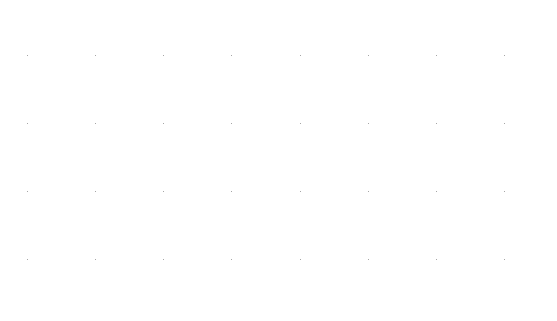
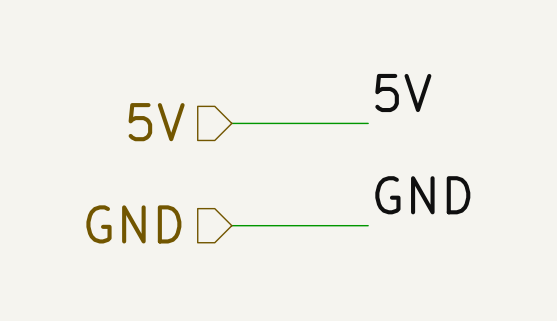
label: none -> 5V (403, 93)
hierarchical label: none -> 5V (156, 122)
wire: none -> (231, 123) (368, 123)
label: none -> GND (422, 195)
hierarchical label: none -> GND (133, 224)
wire: none -> (231, 225) (368, 225)

